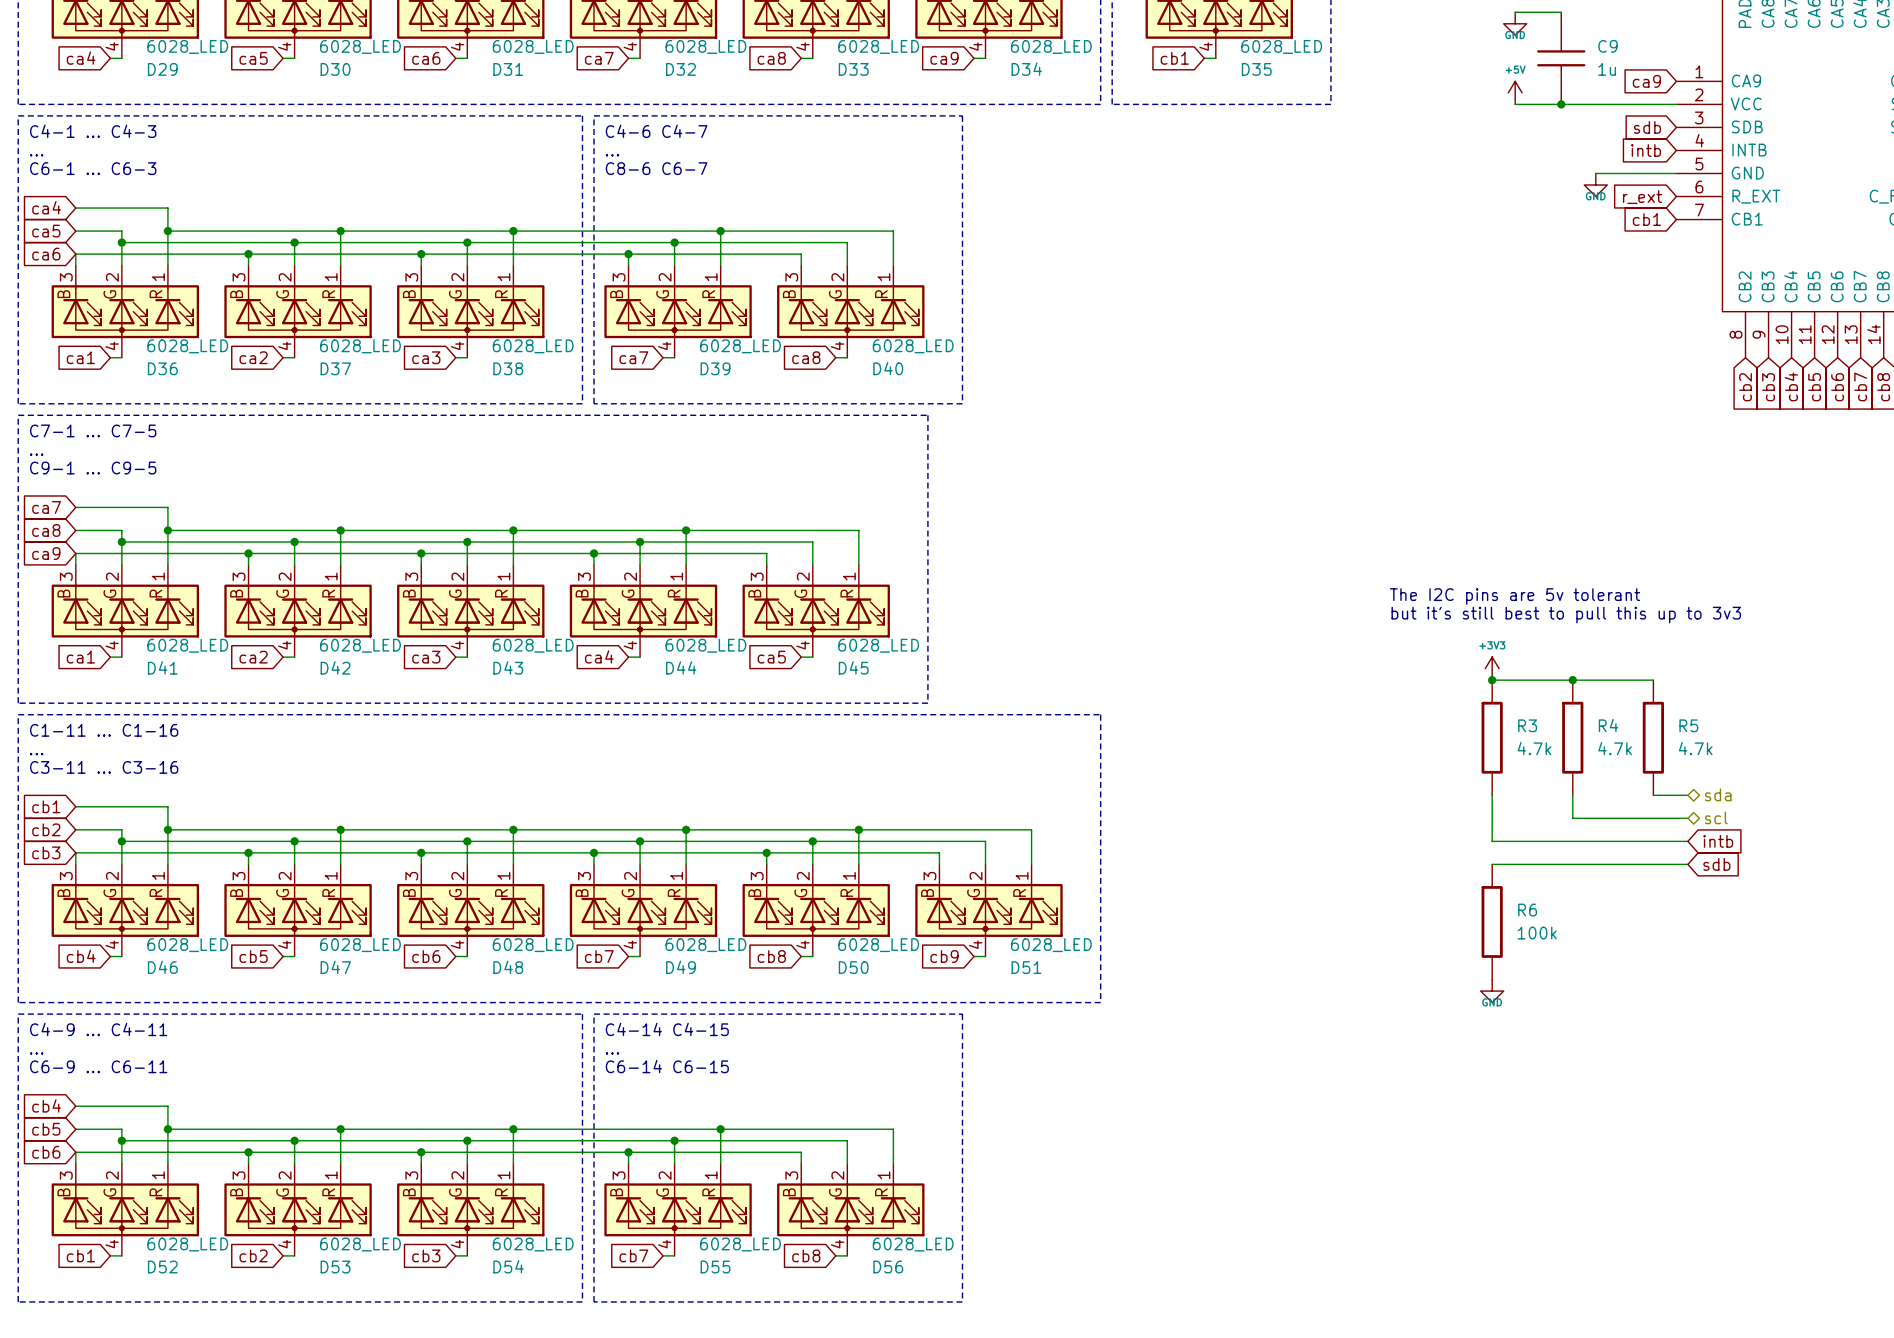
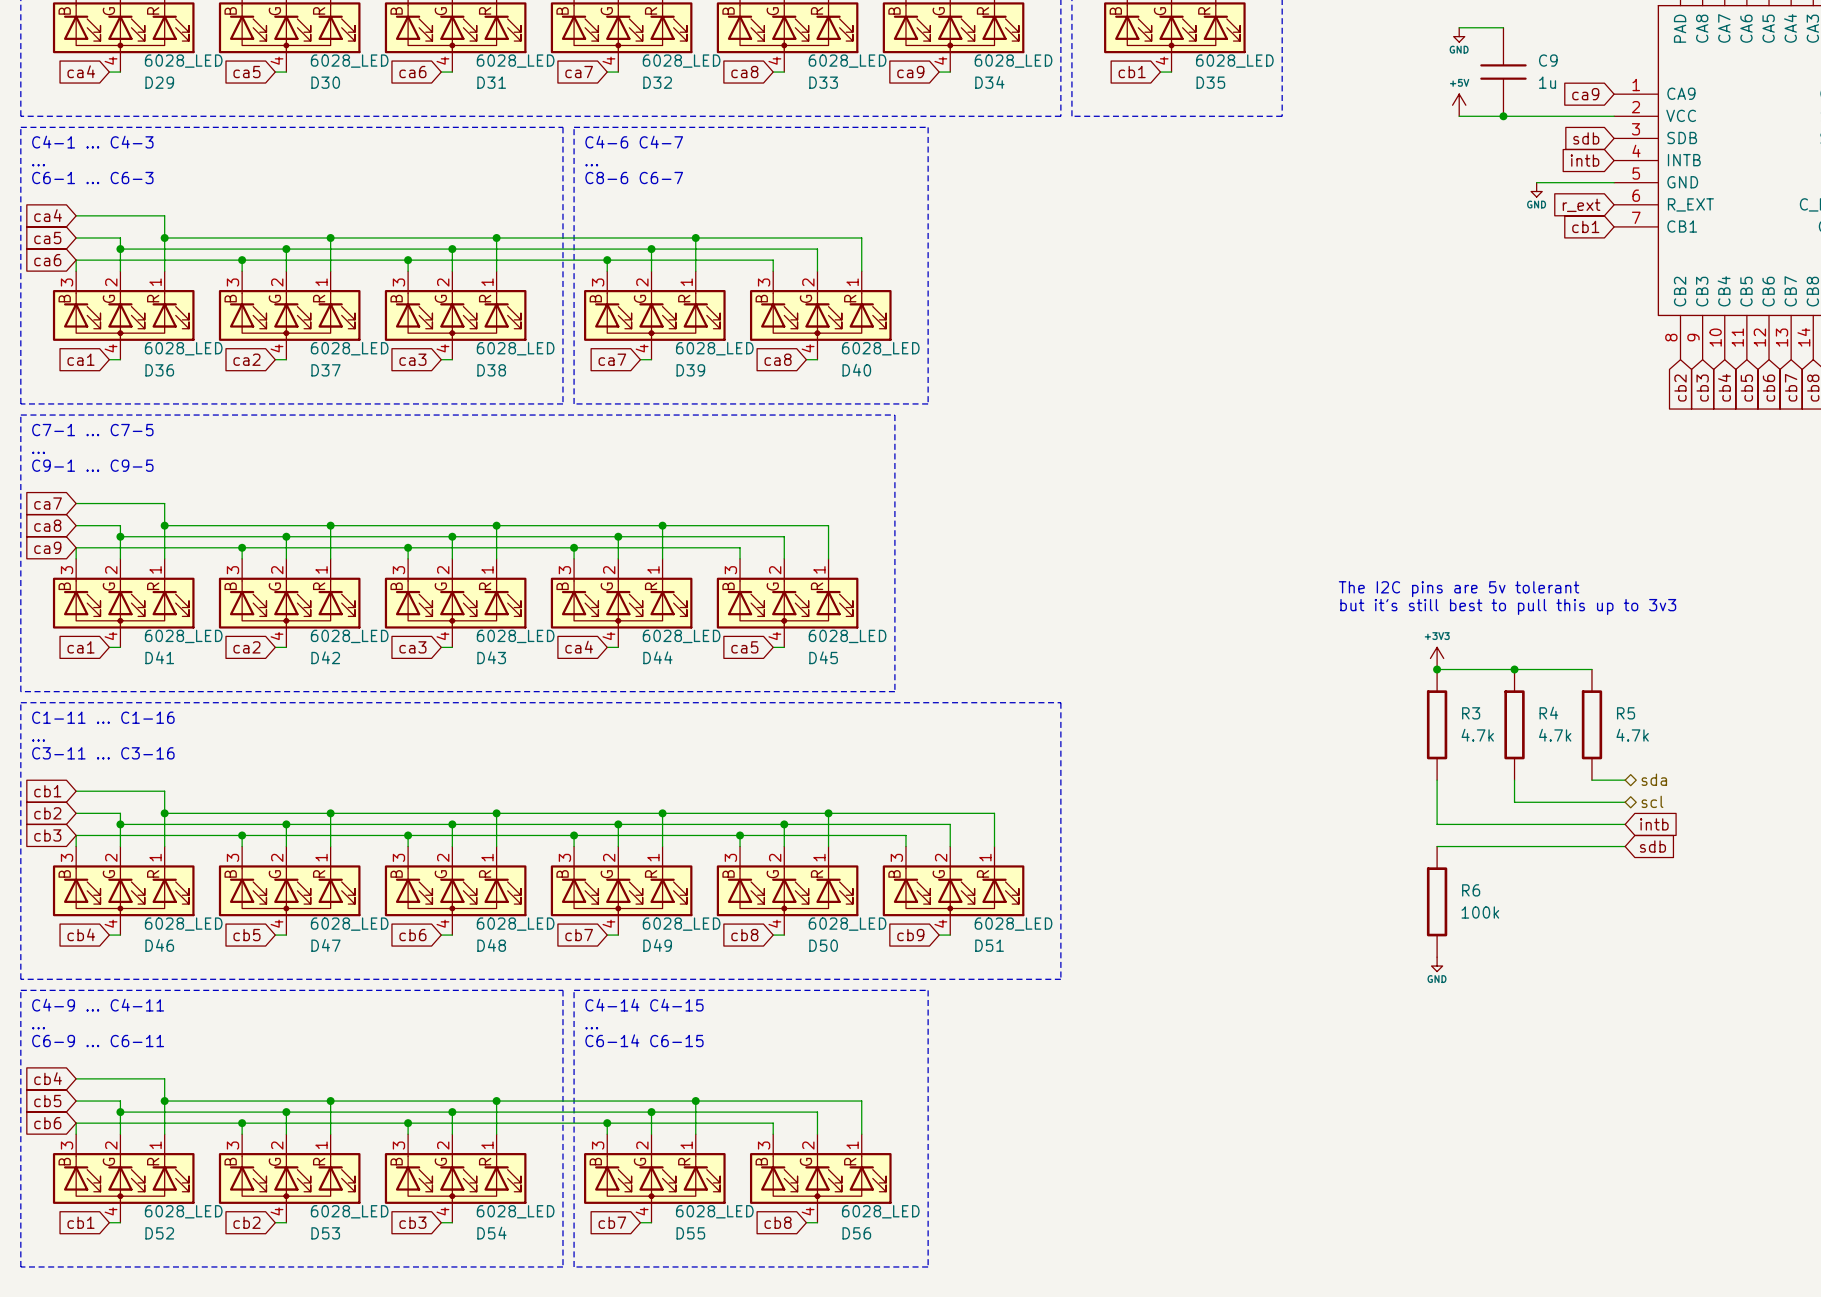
power symbol shape: [1503, 12, 1527, 36] -> [1453, 27, 1465, 43]
power symbol shape: [1584, 173, 1608, 197] -> [1531, 182, 1543, 198]
power symbol shape: [1480, 979, 1504, 1003] -> [1431, 957, 1443, 972]

